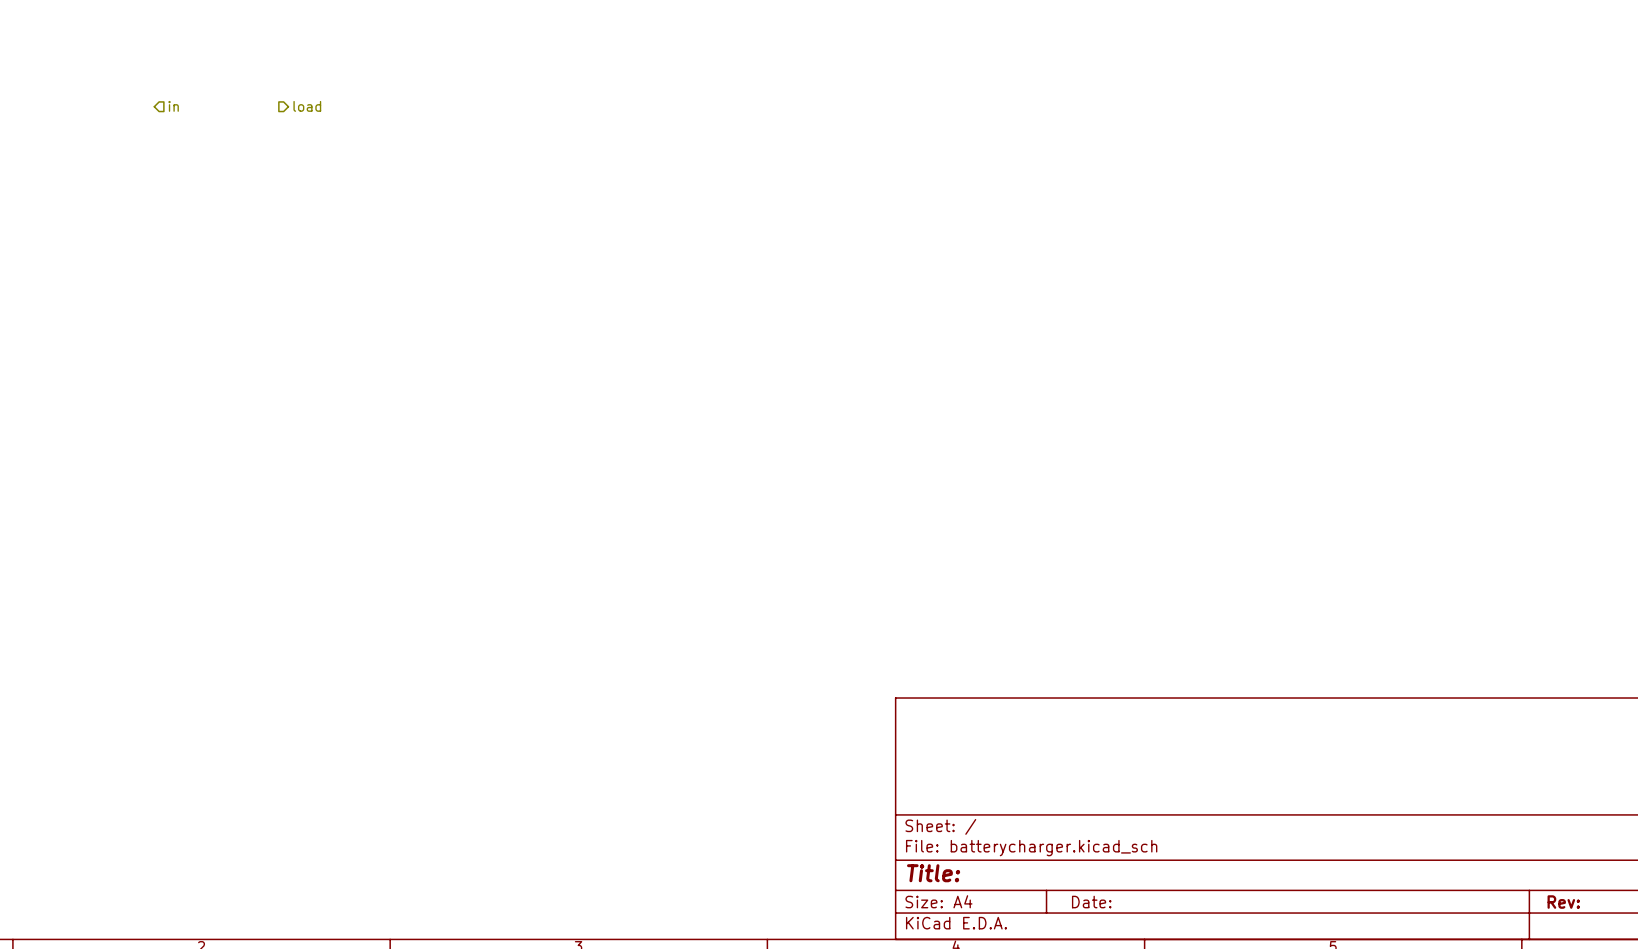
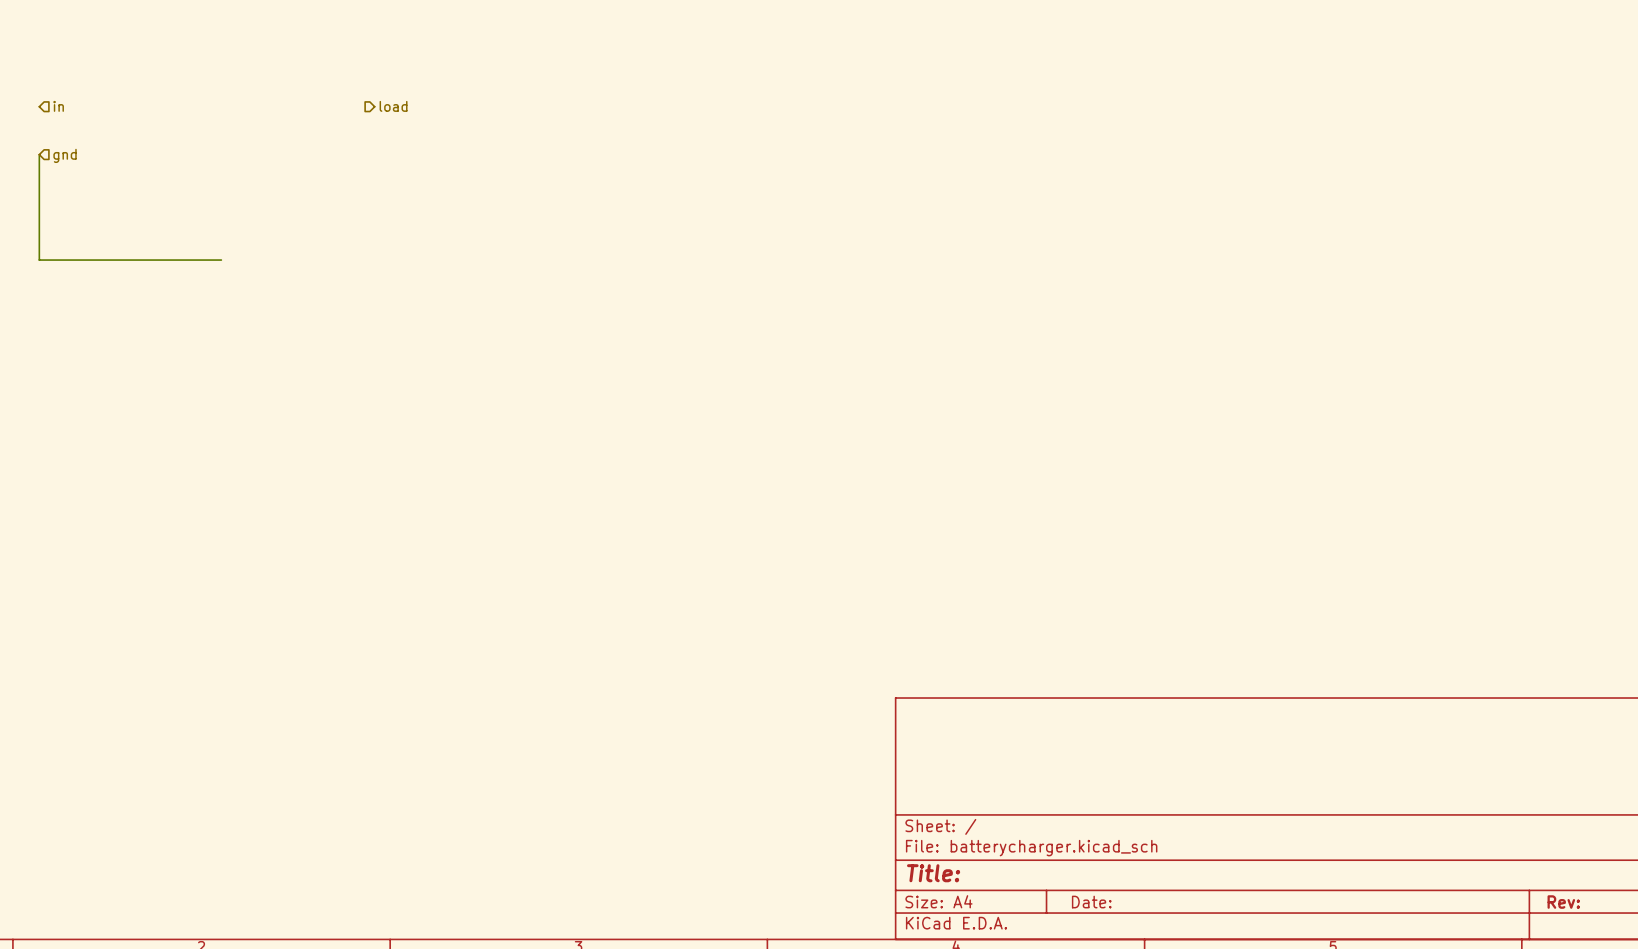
hierarchical label position: in (173, 106) -> in (58, 106)
hierarchical label position: load (307, 106) -> load (393, 106)
wire: none -> (39, 154) (39, 260) (221, 260)
hierarchical label: none -> gnd (65, 155)

